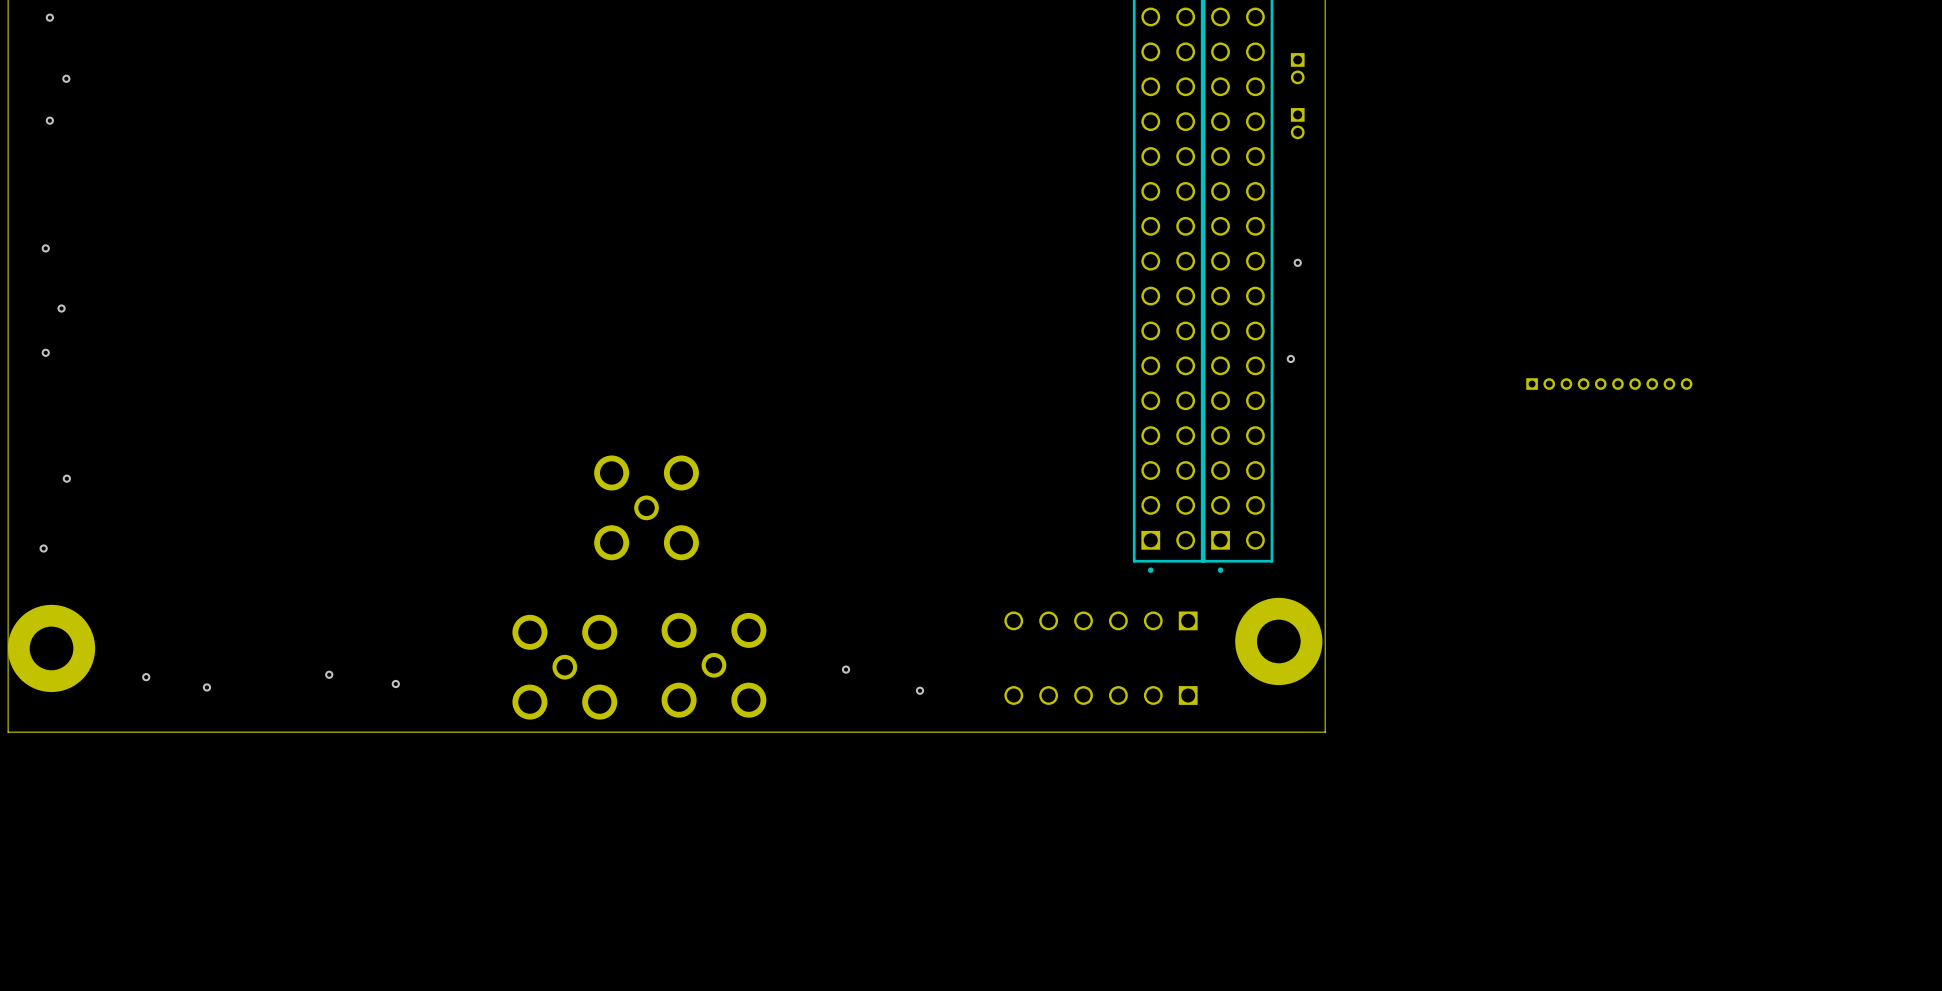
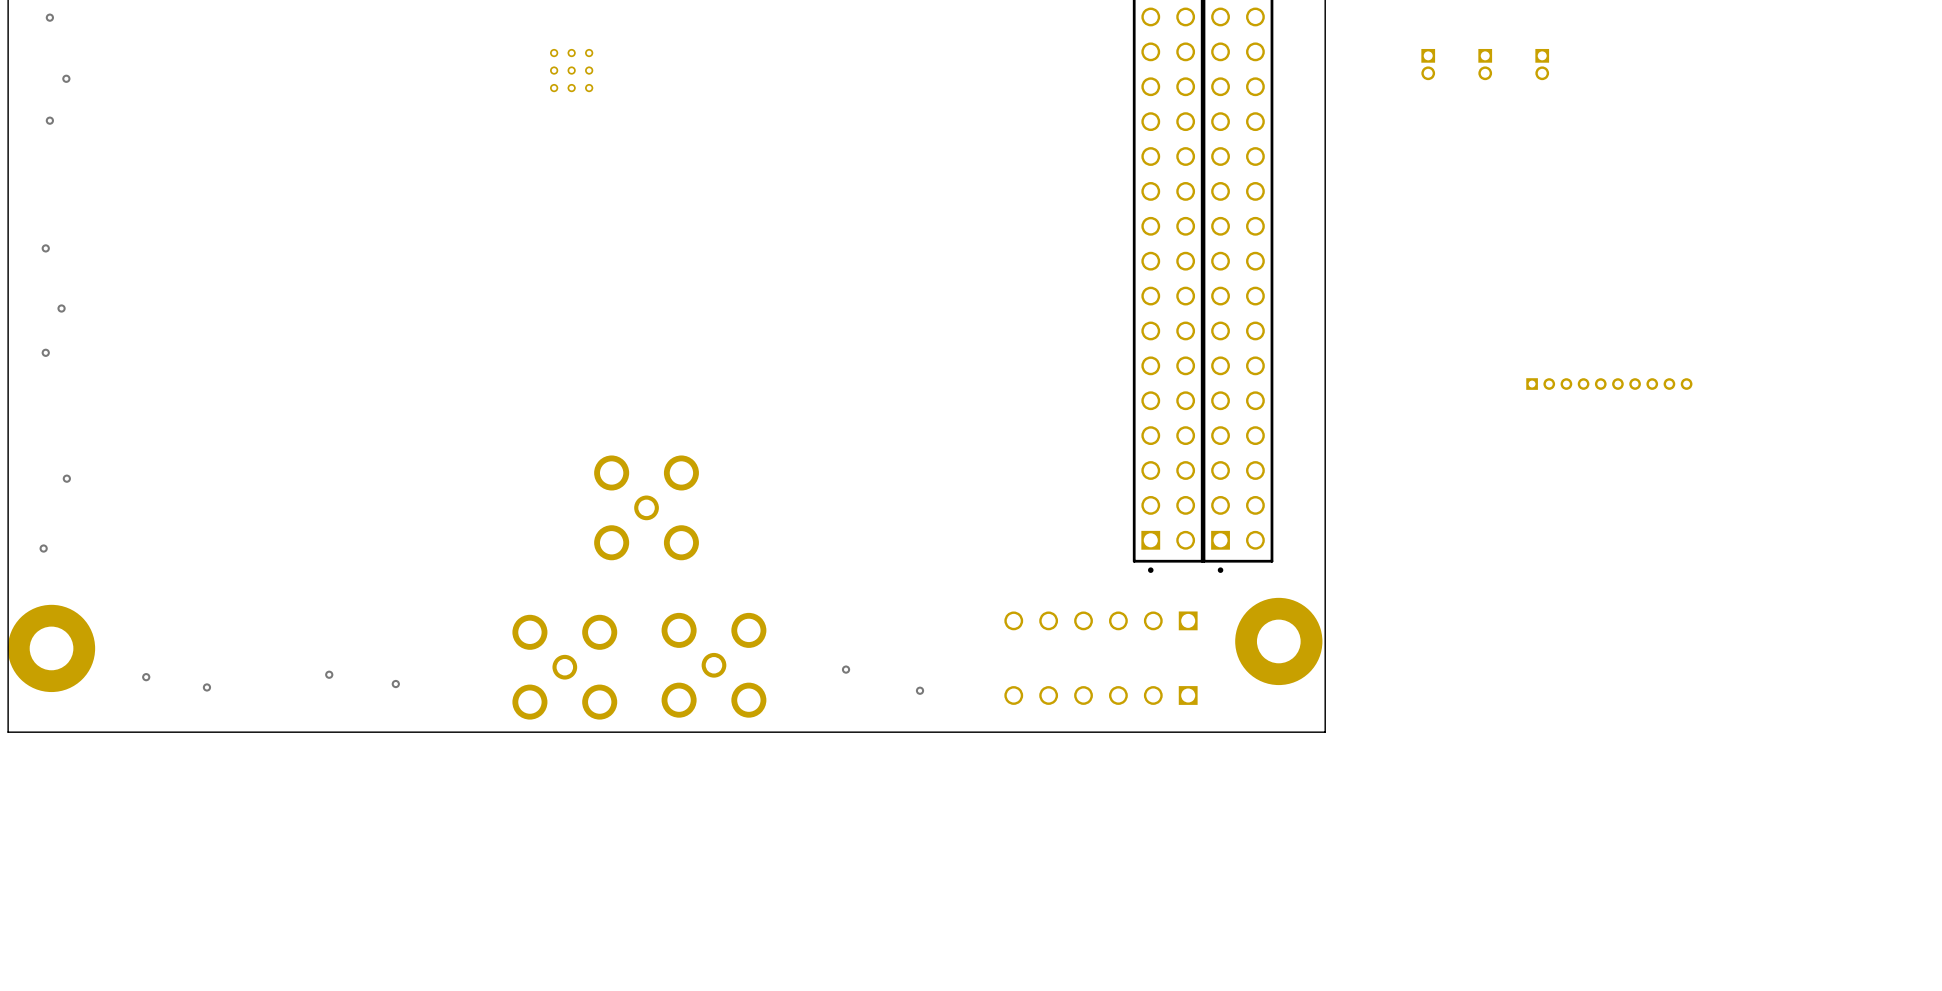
part: none -> (1428, 64)
part: none -> (1485, 64)
part: none -> (1542, 64)
part: (1297, 68) -> none
part: none -> (571, 70)
part: (1297, 123) -> none
via: (1297, 262) -> none
via: (1290, 358) -> none

